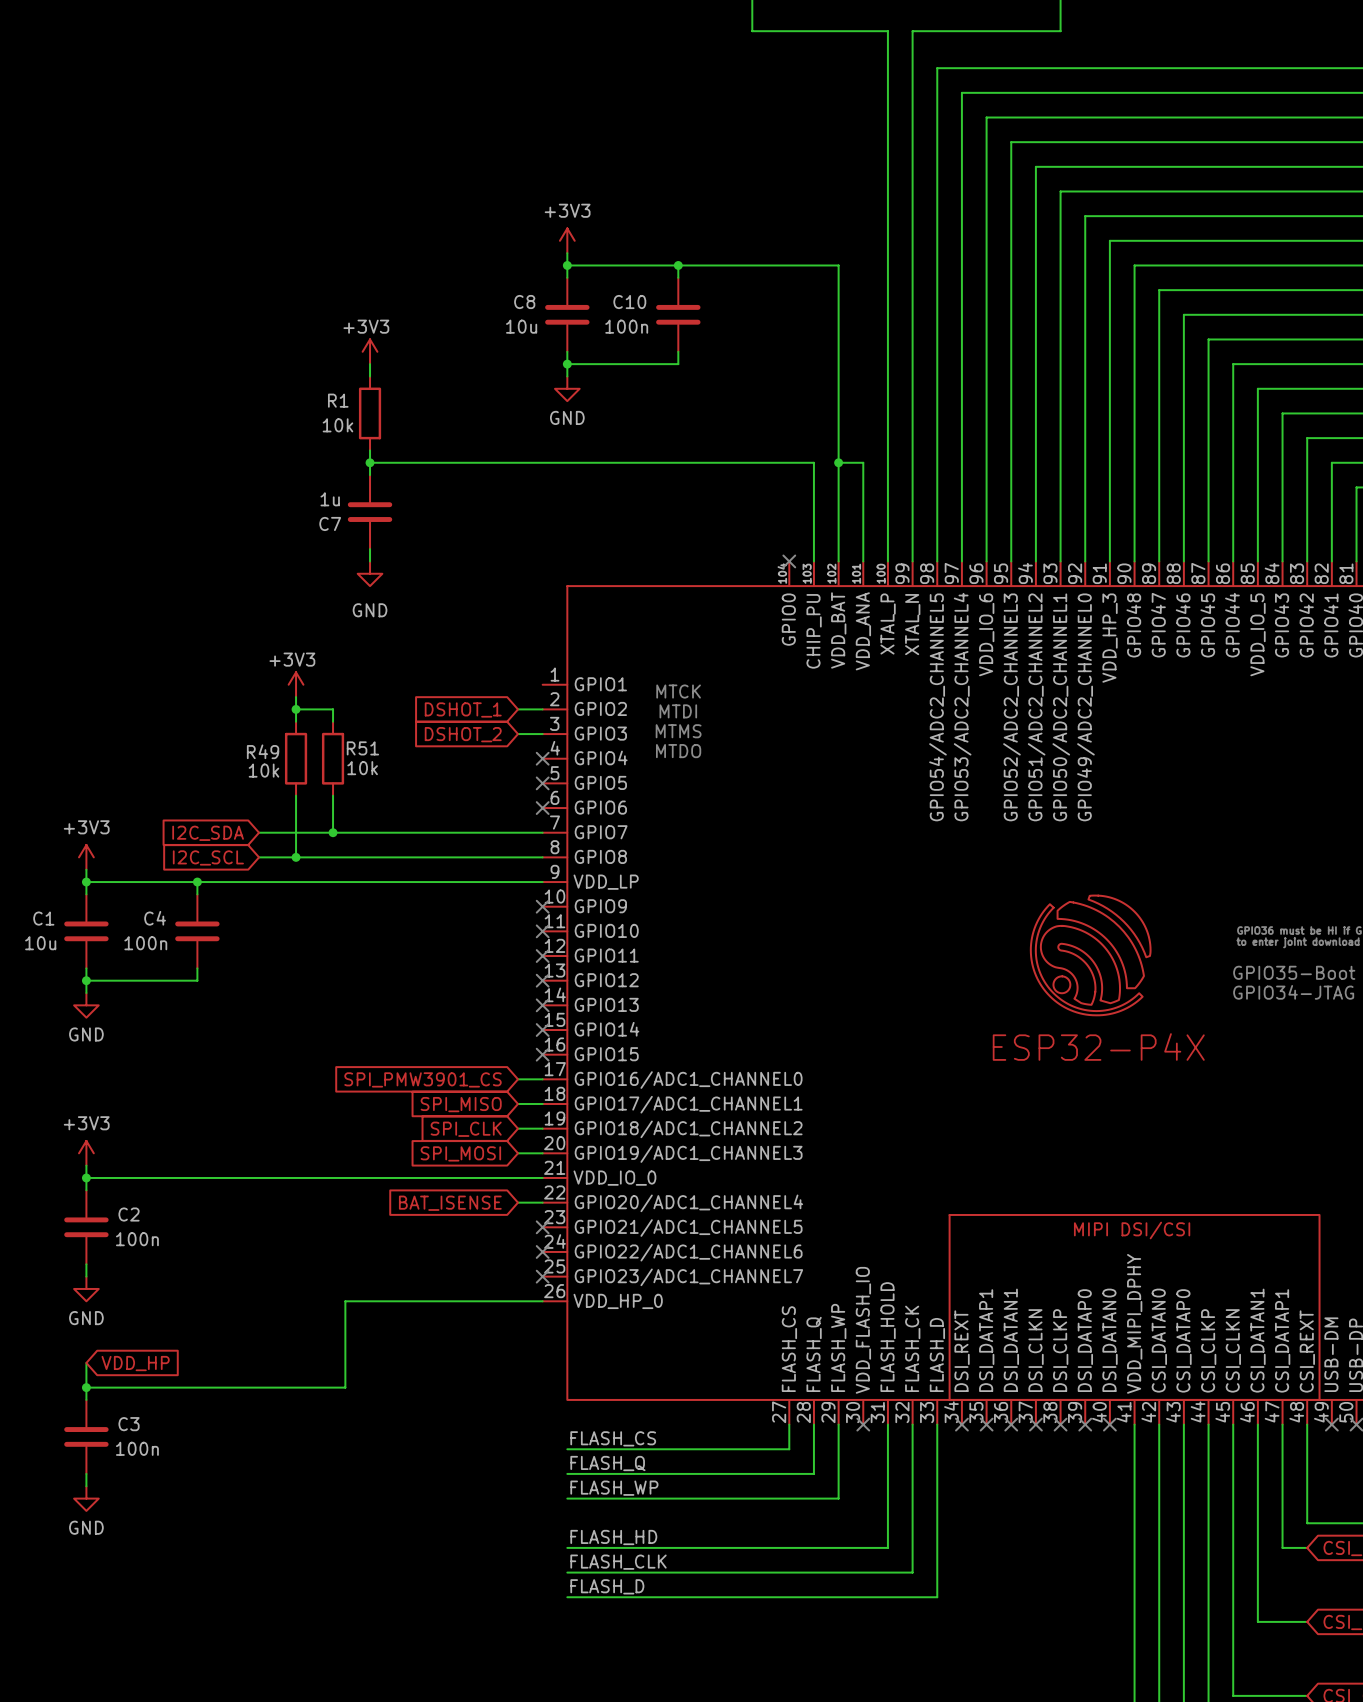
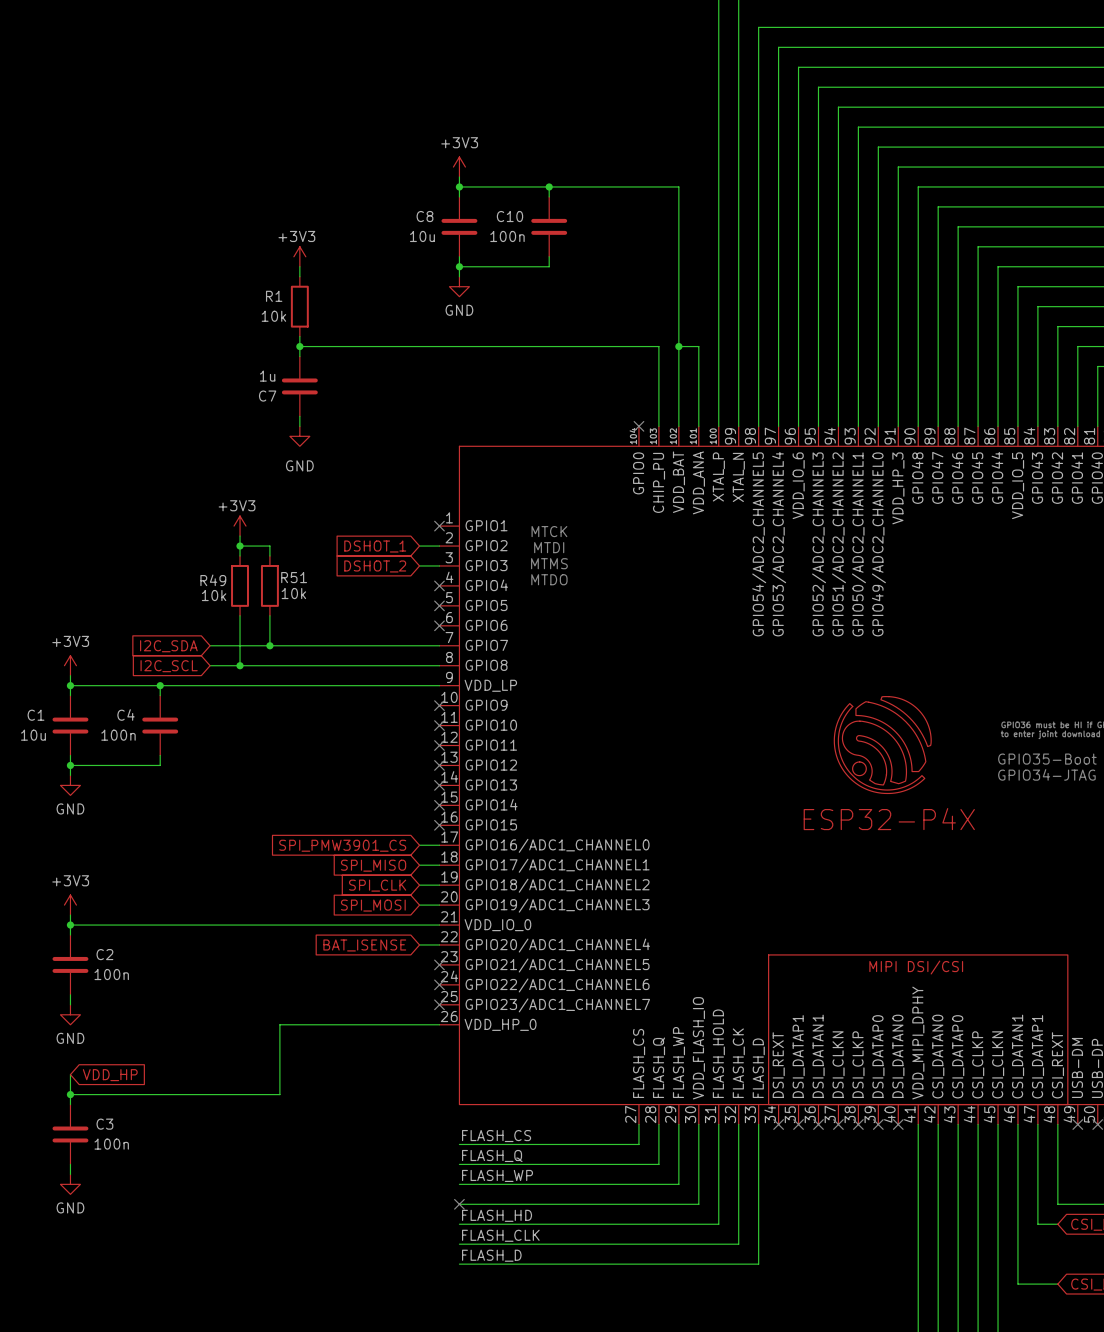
no-connect mark: none -> (439, 526)
wire: none -> (698, 1124) (698, 1204) (459, 1204)
no-connect mark: (863, 1424) -> none
no-connect mark: none -> (459, 1204)

